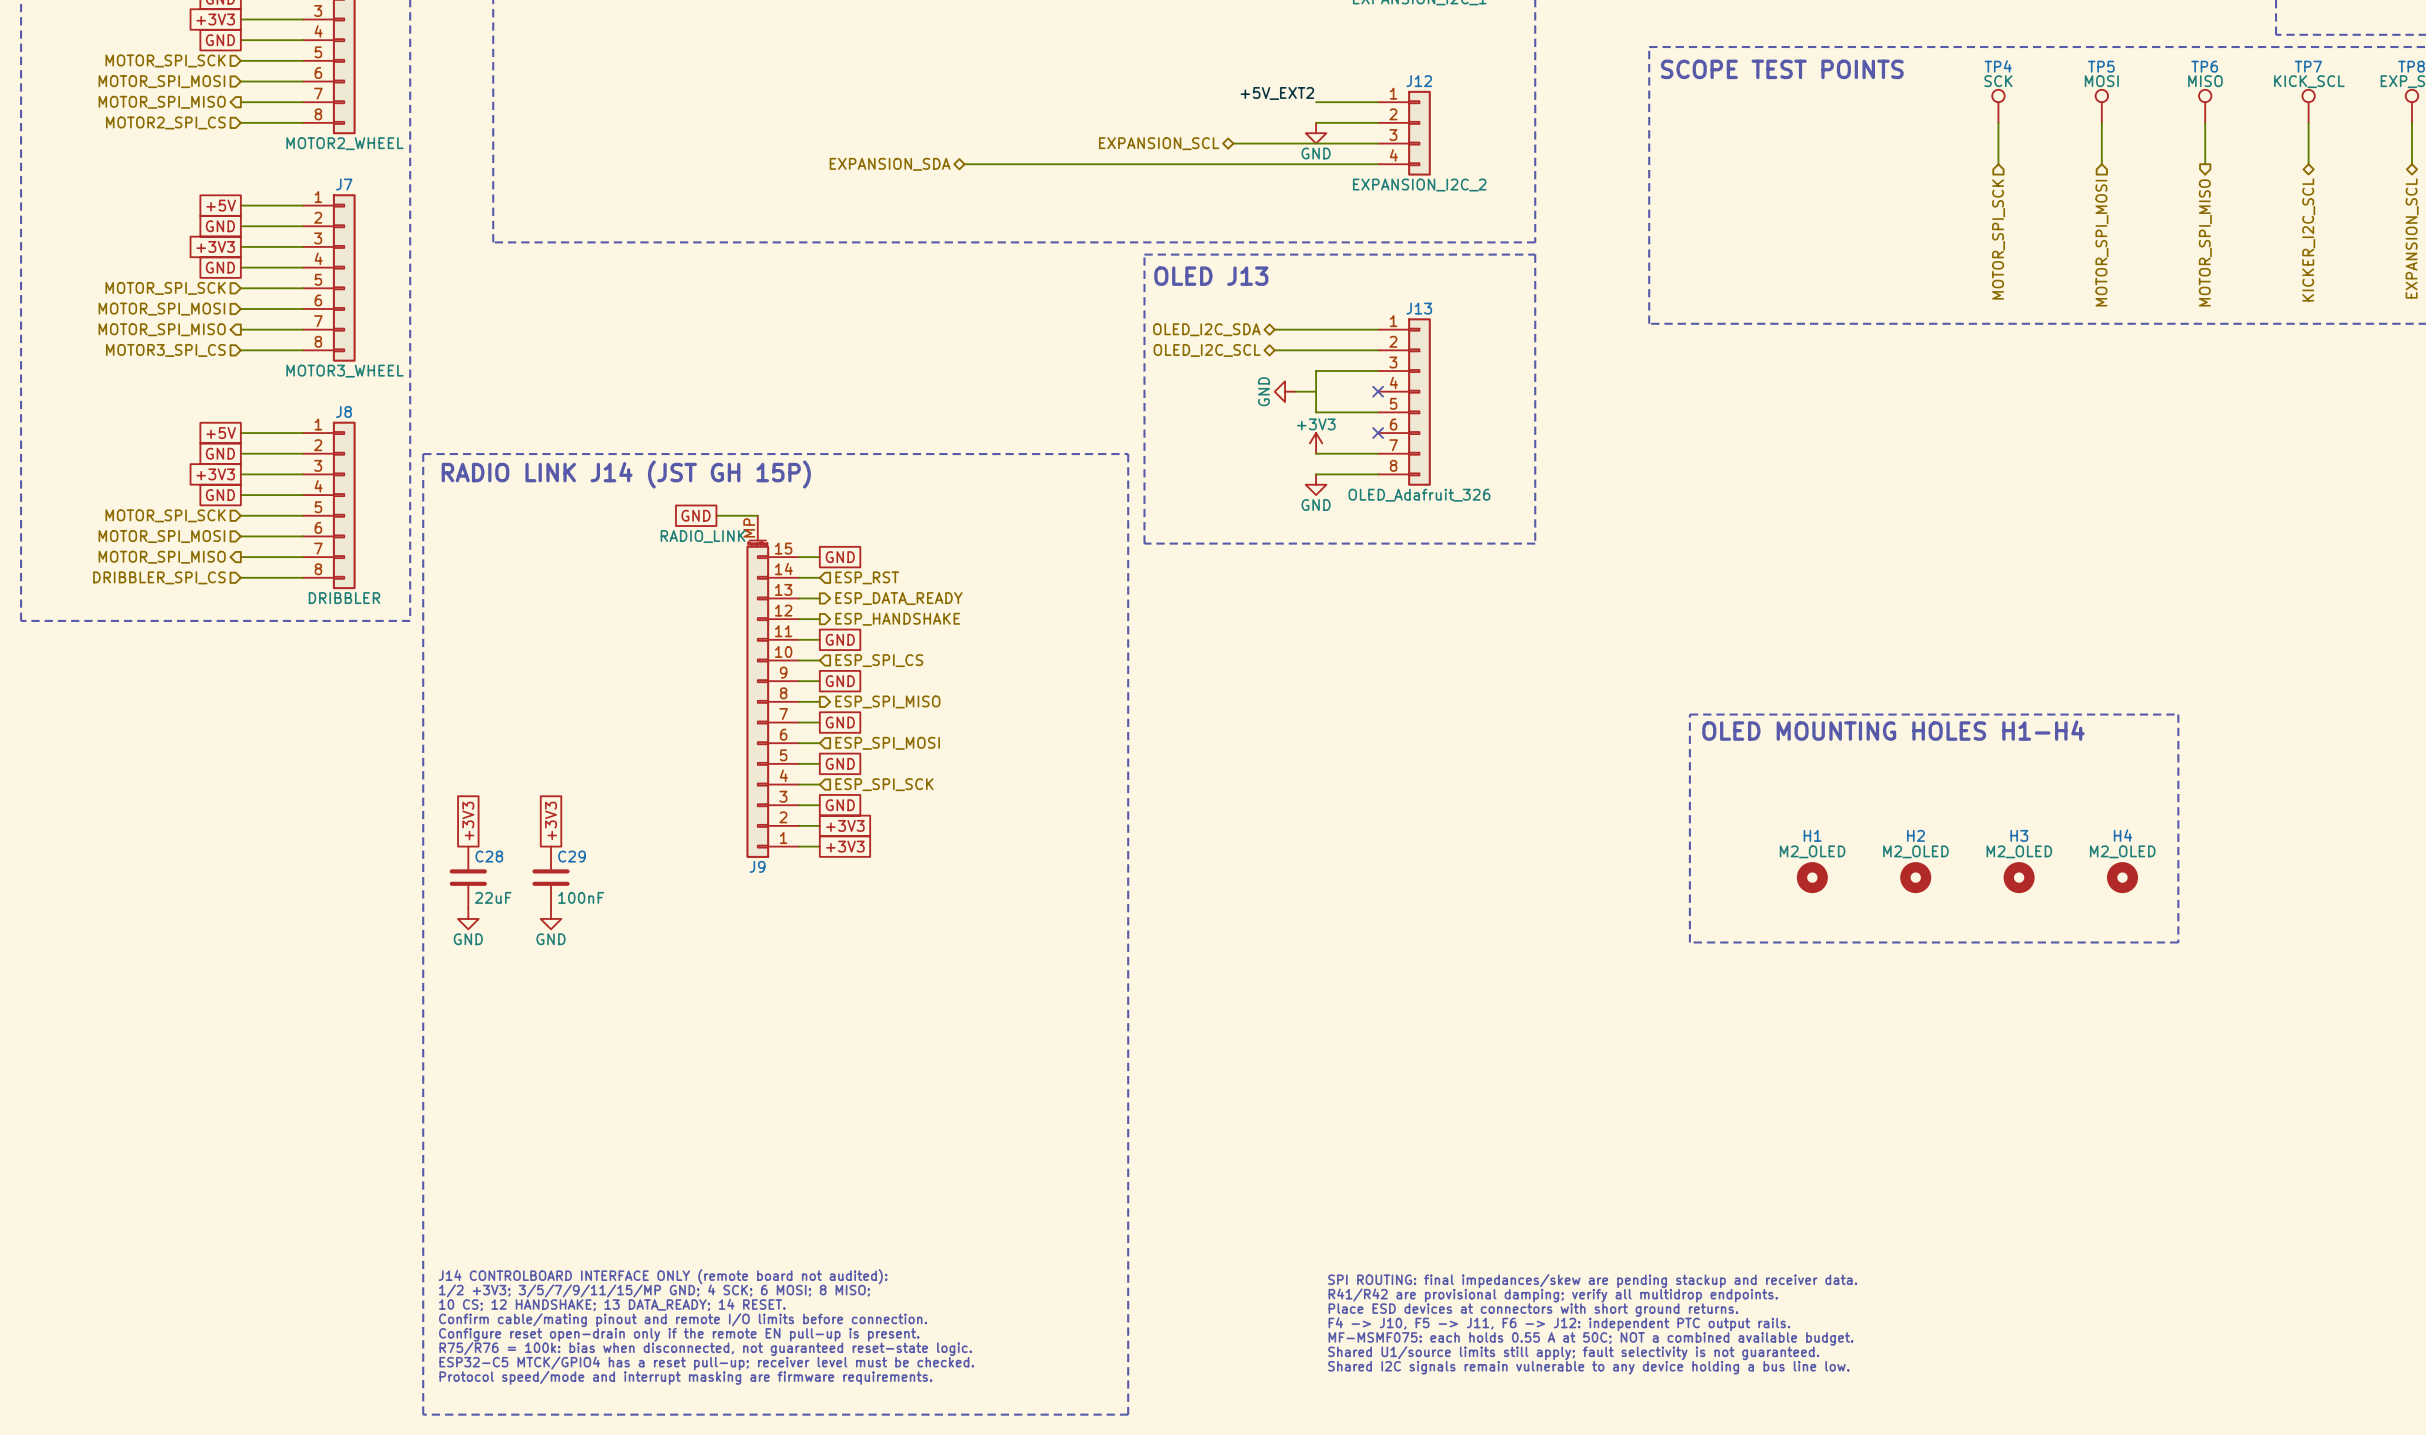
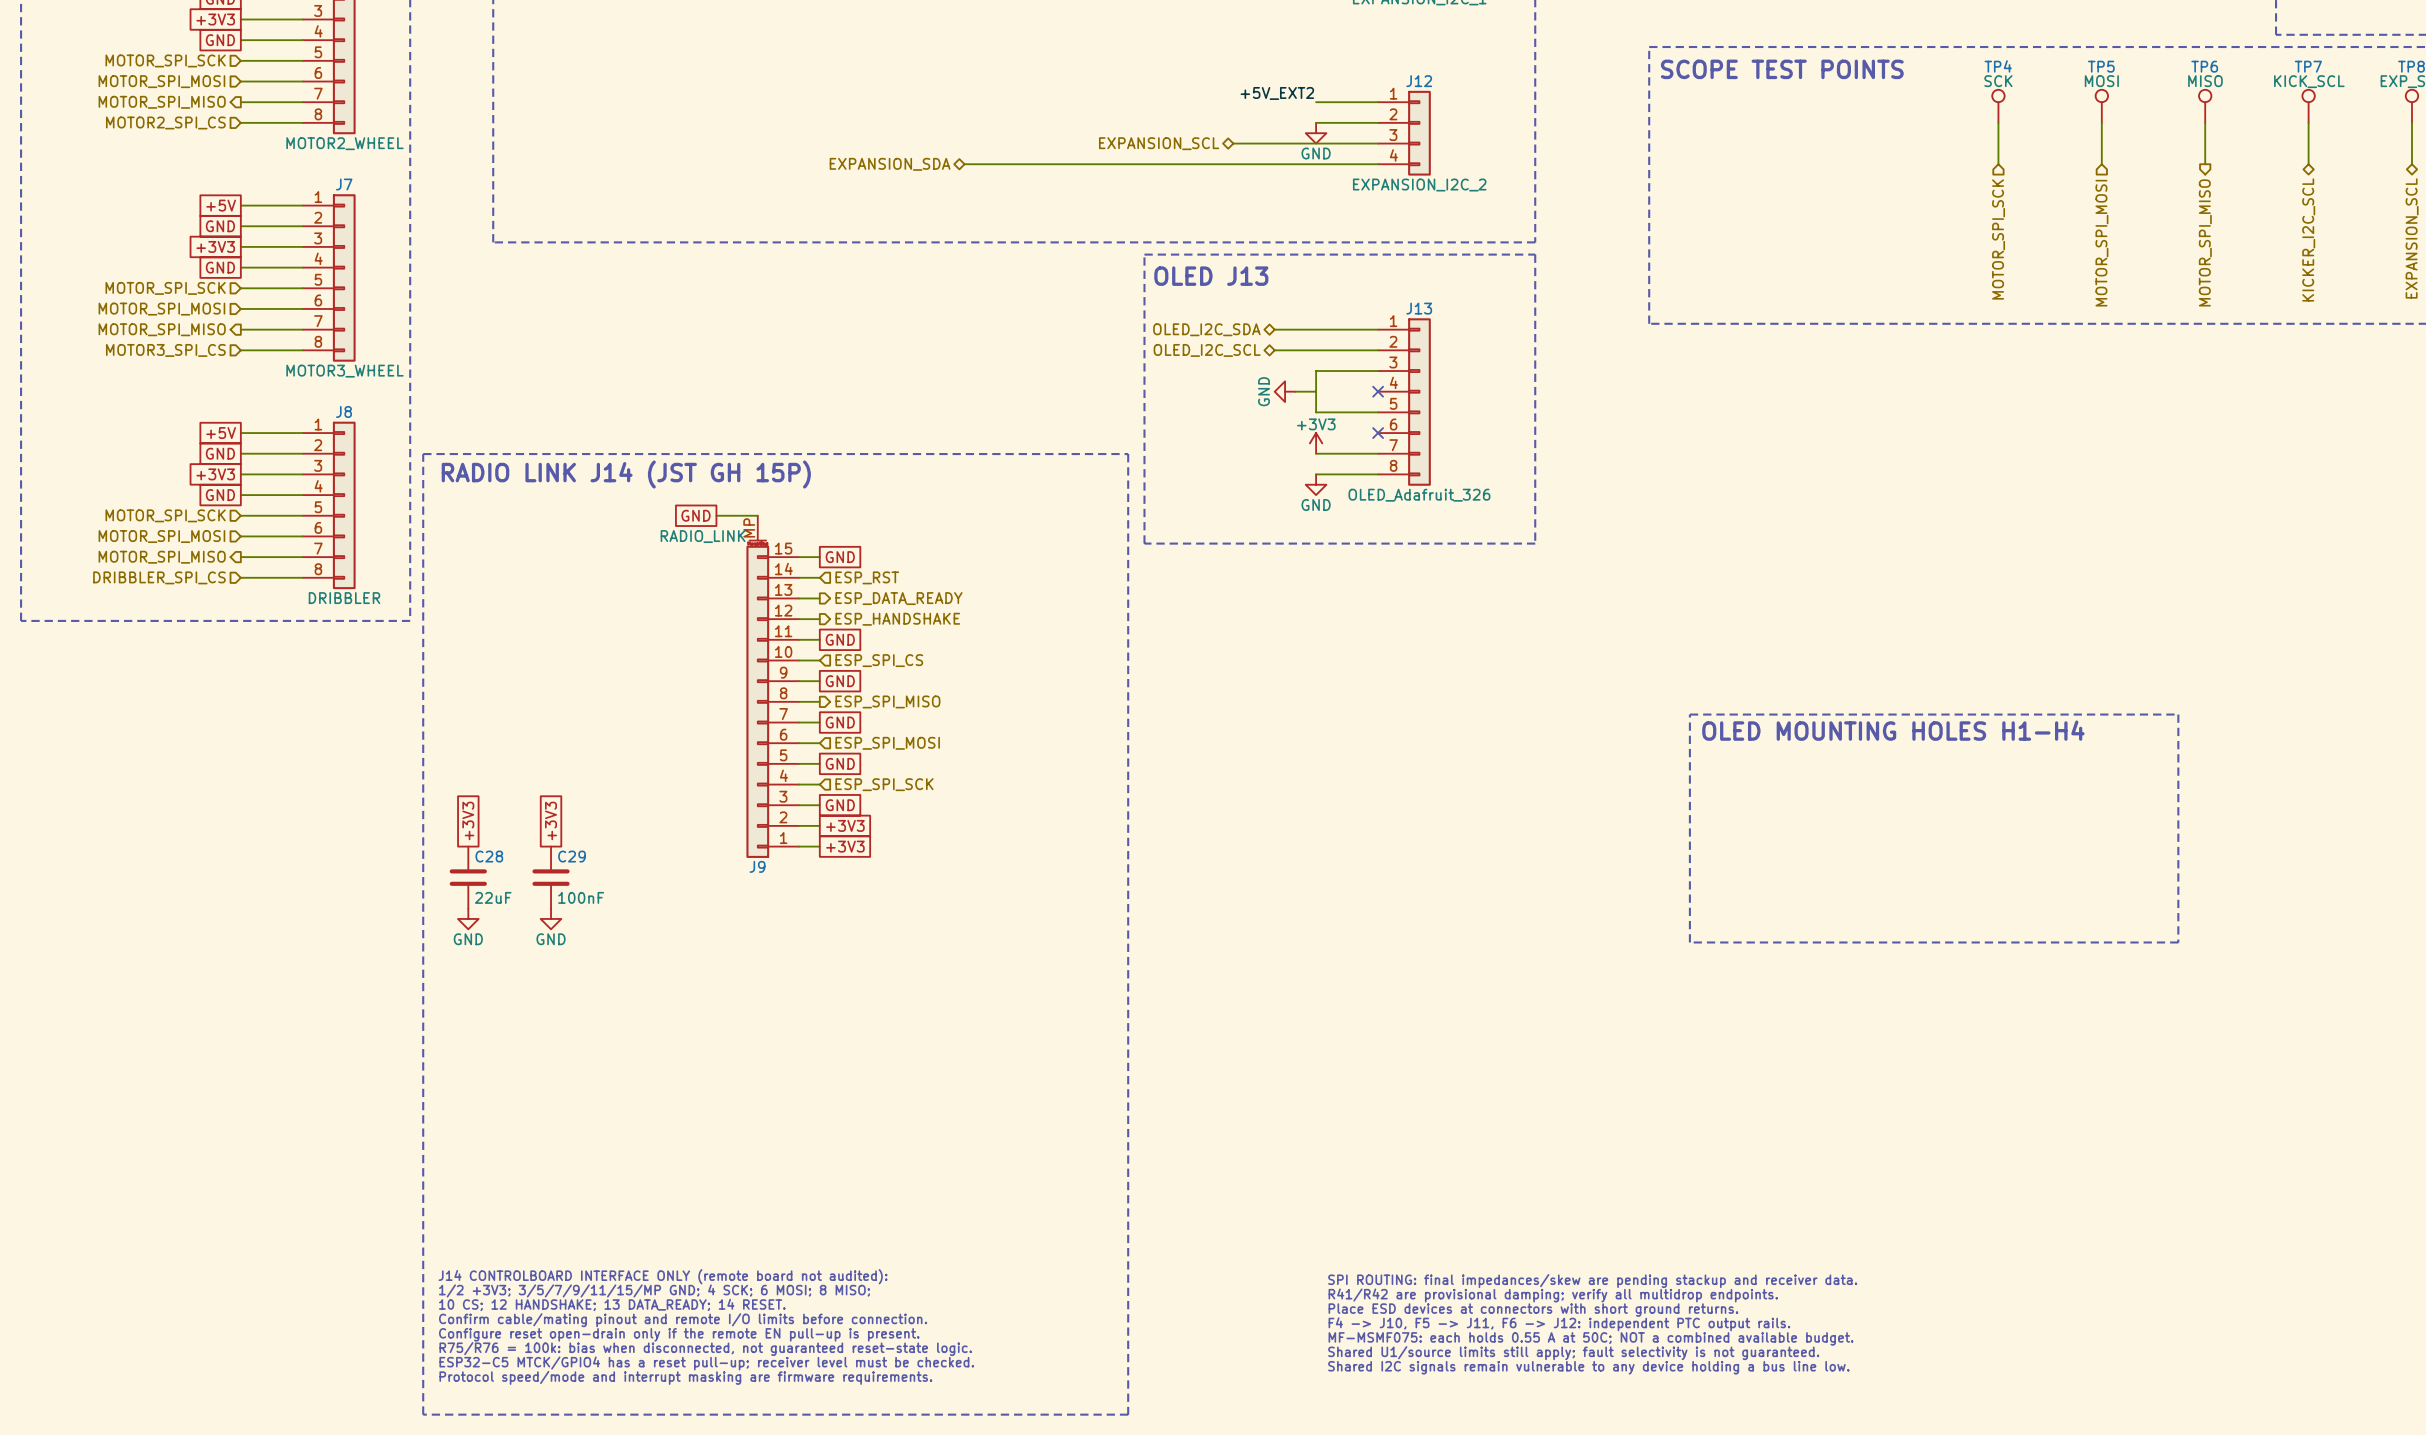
H1: M2_OLED (1812, 877) -> none
H2: M2_OLED (1915, 877) -> none
H3: M2_OLED (2019, 877) -> none
H4: M2_OLED (2122, 877) -> none

